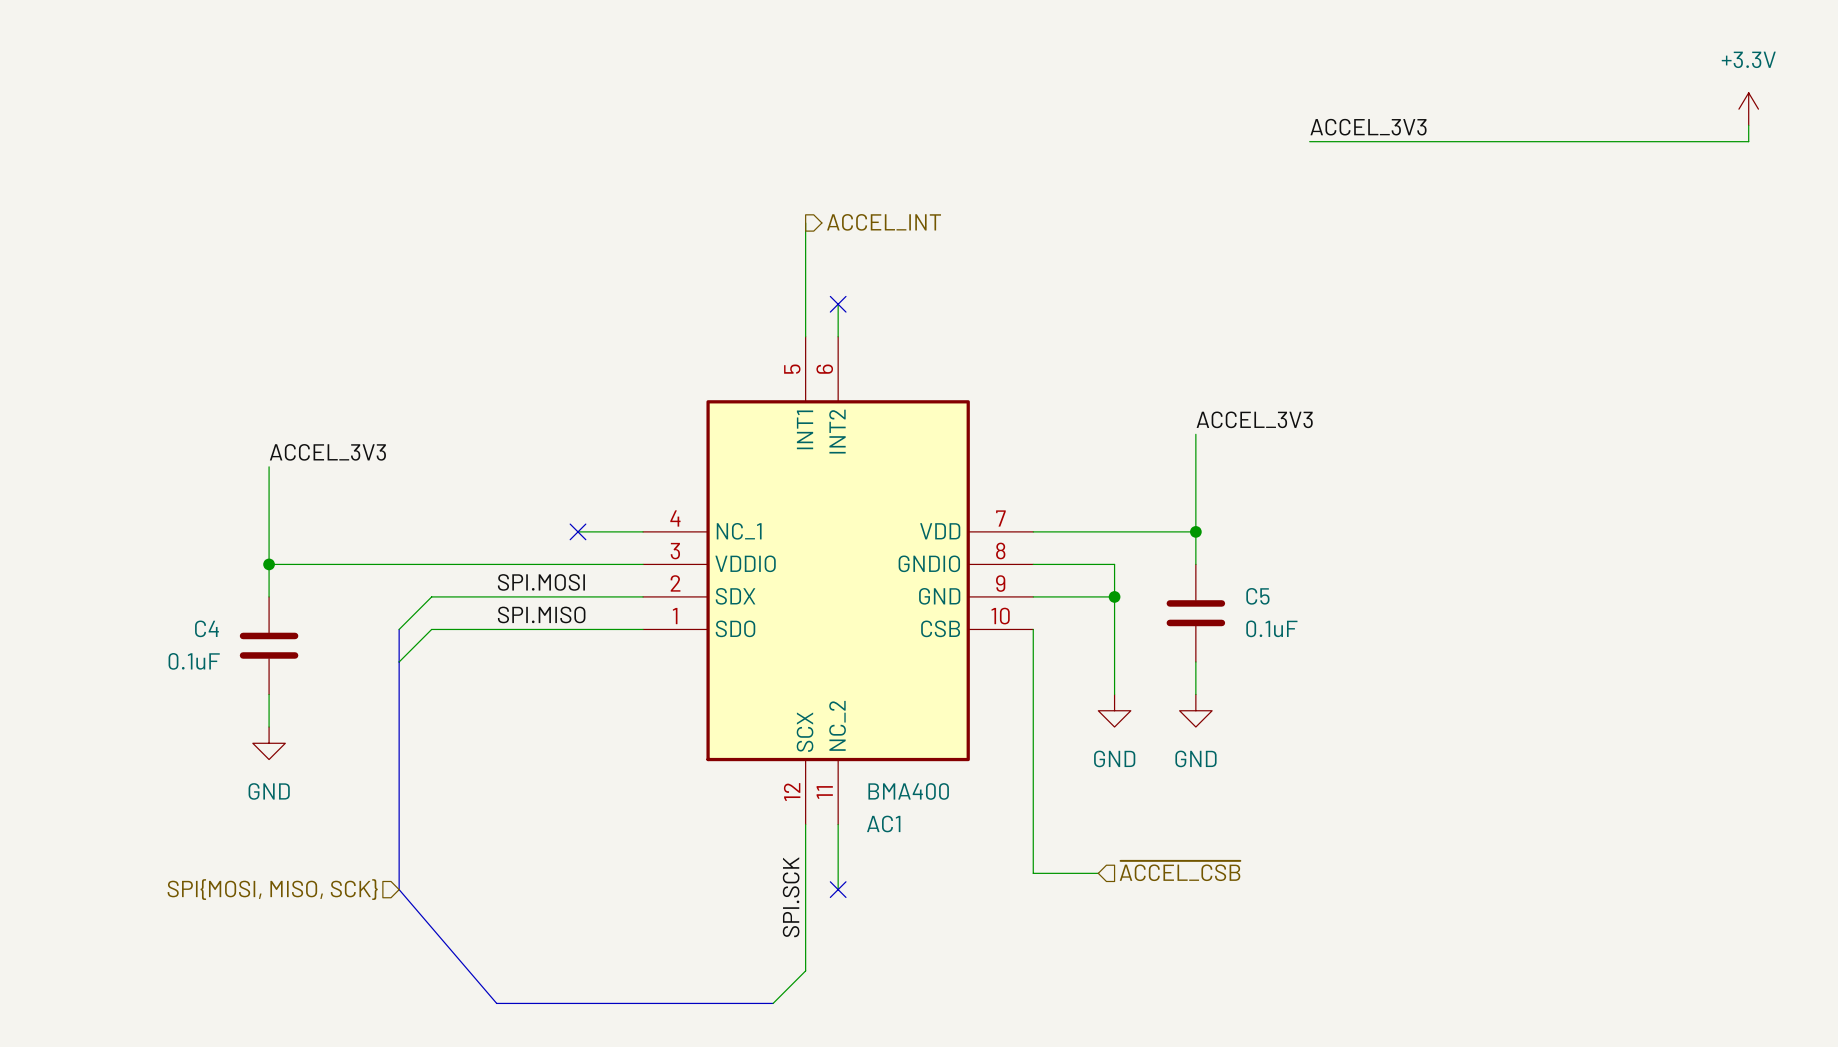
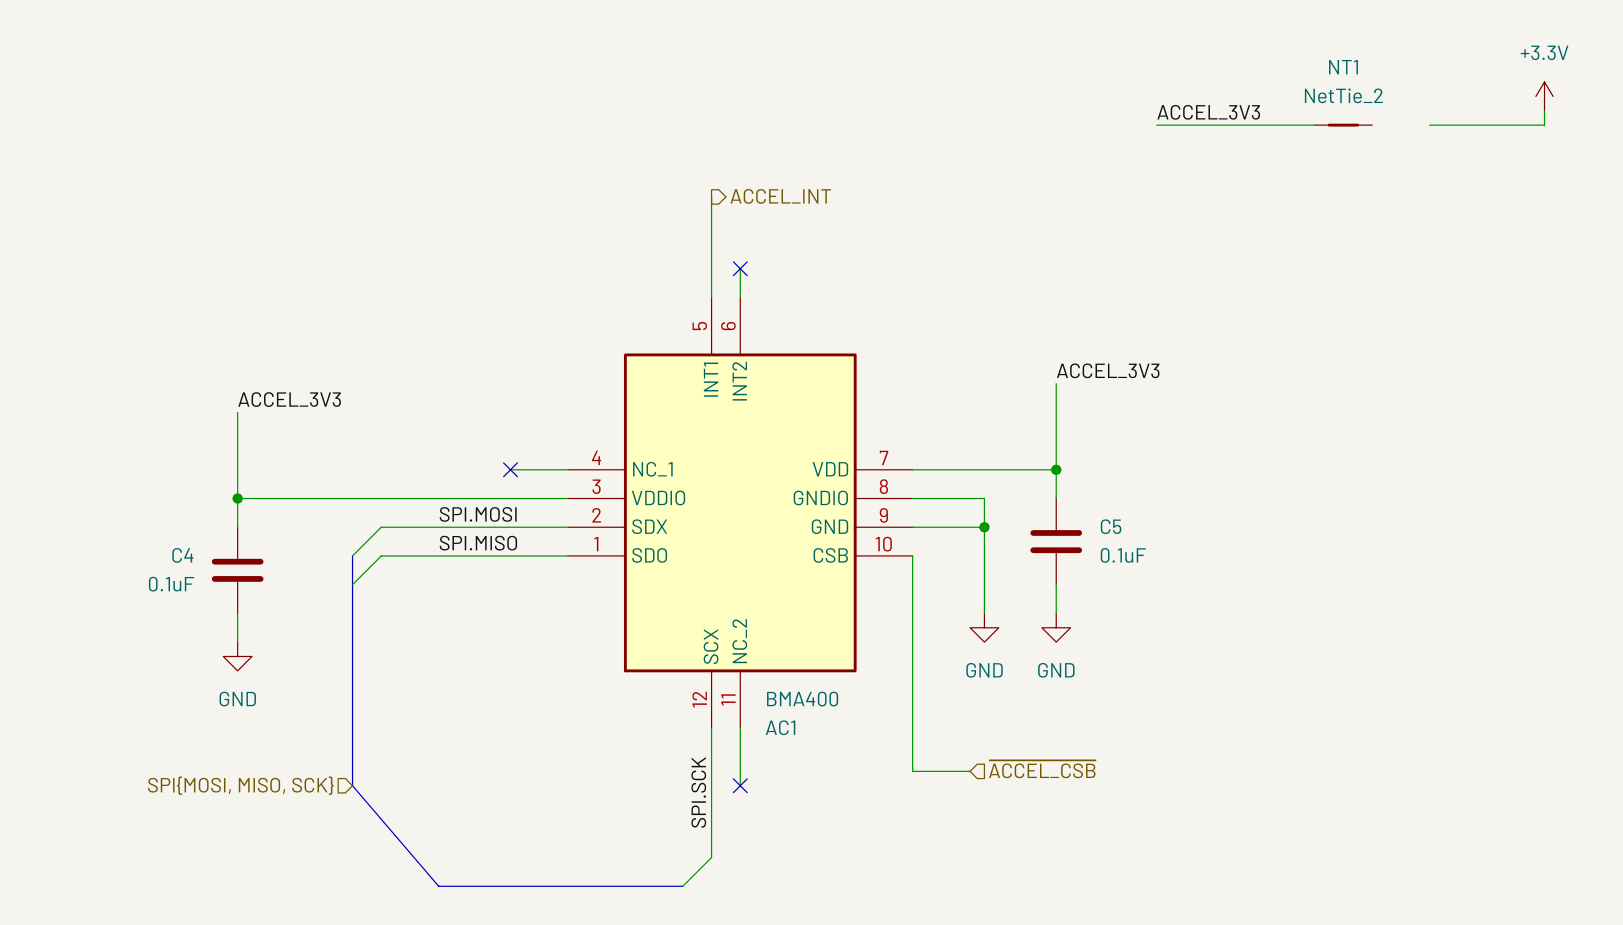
wire: (1488, 141) (1618, 141) -> none
NT1: none -> NetTie_2 (1343, 125)

